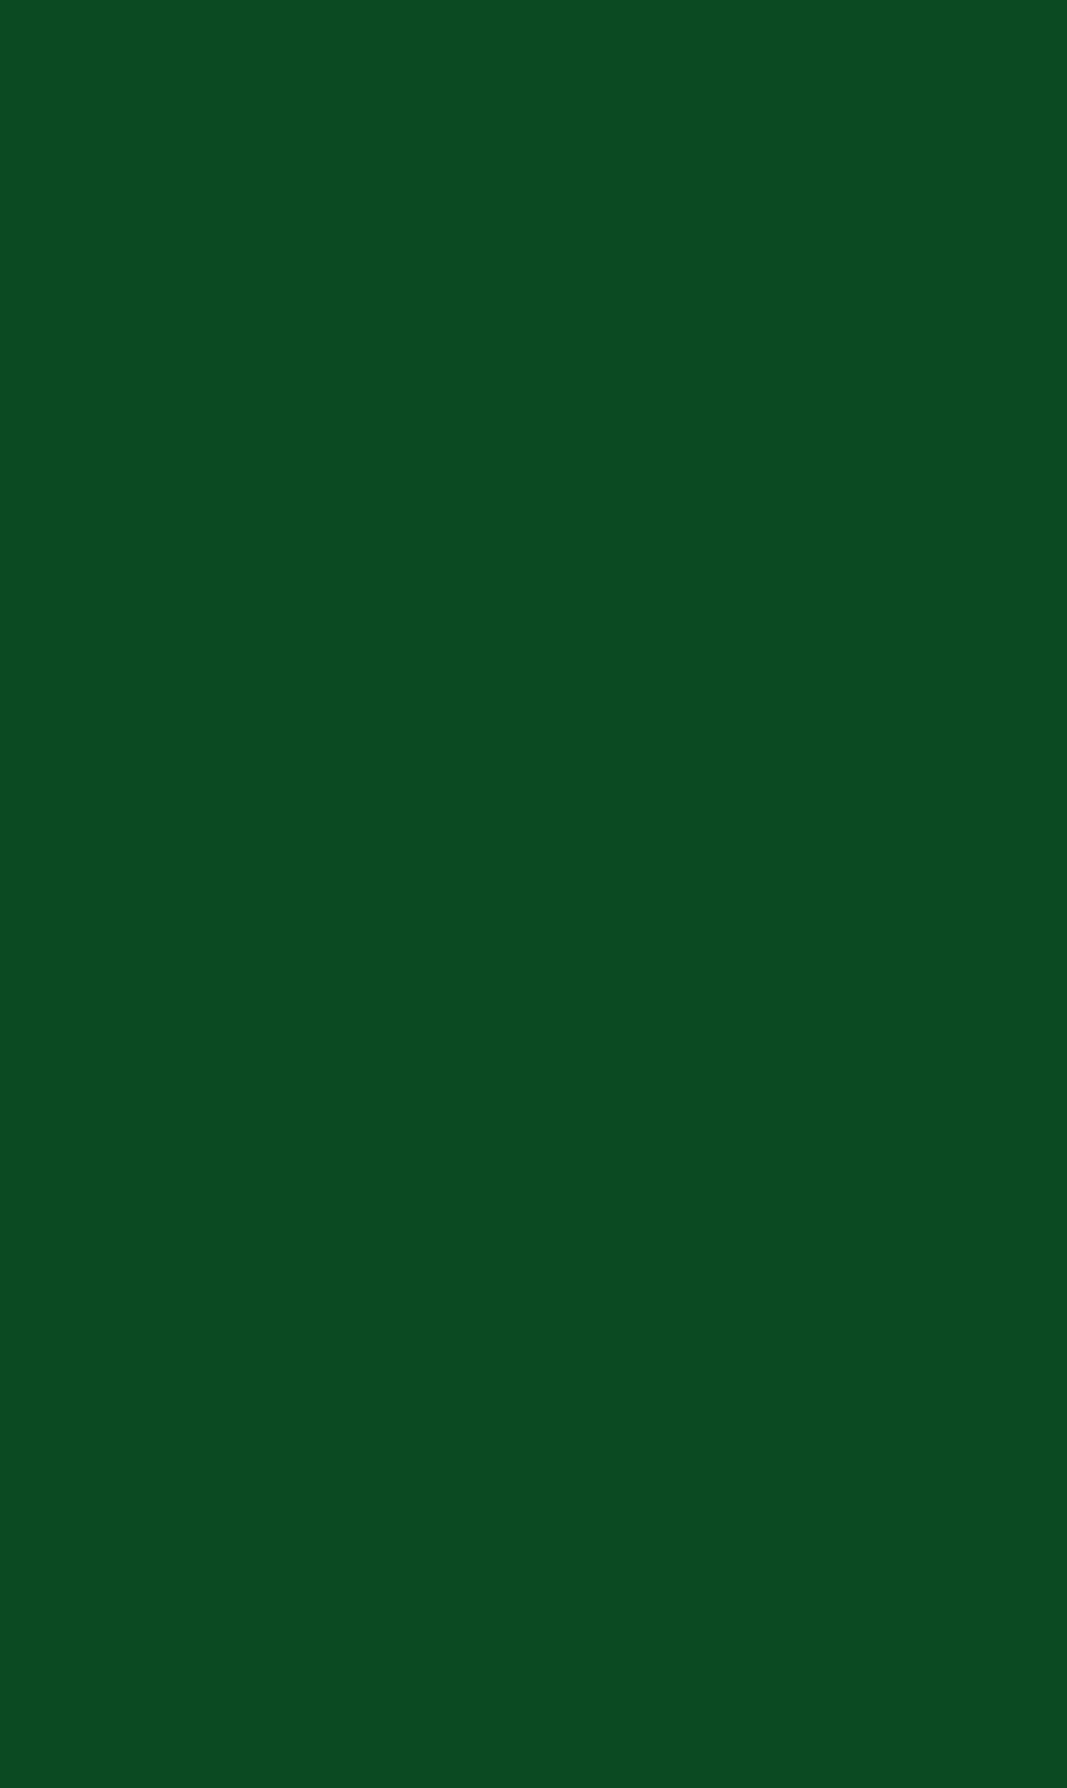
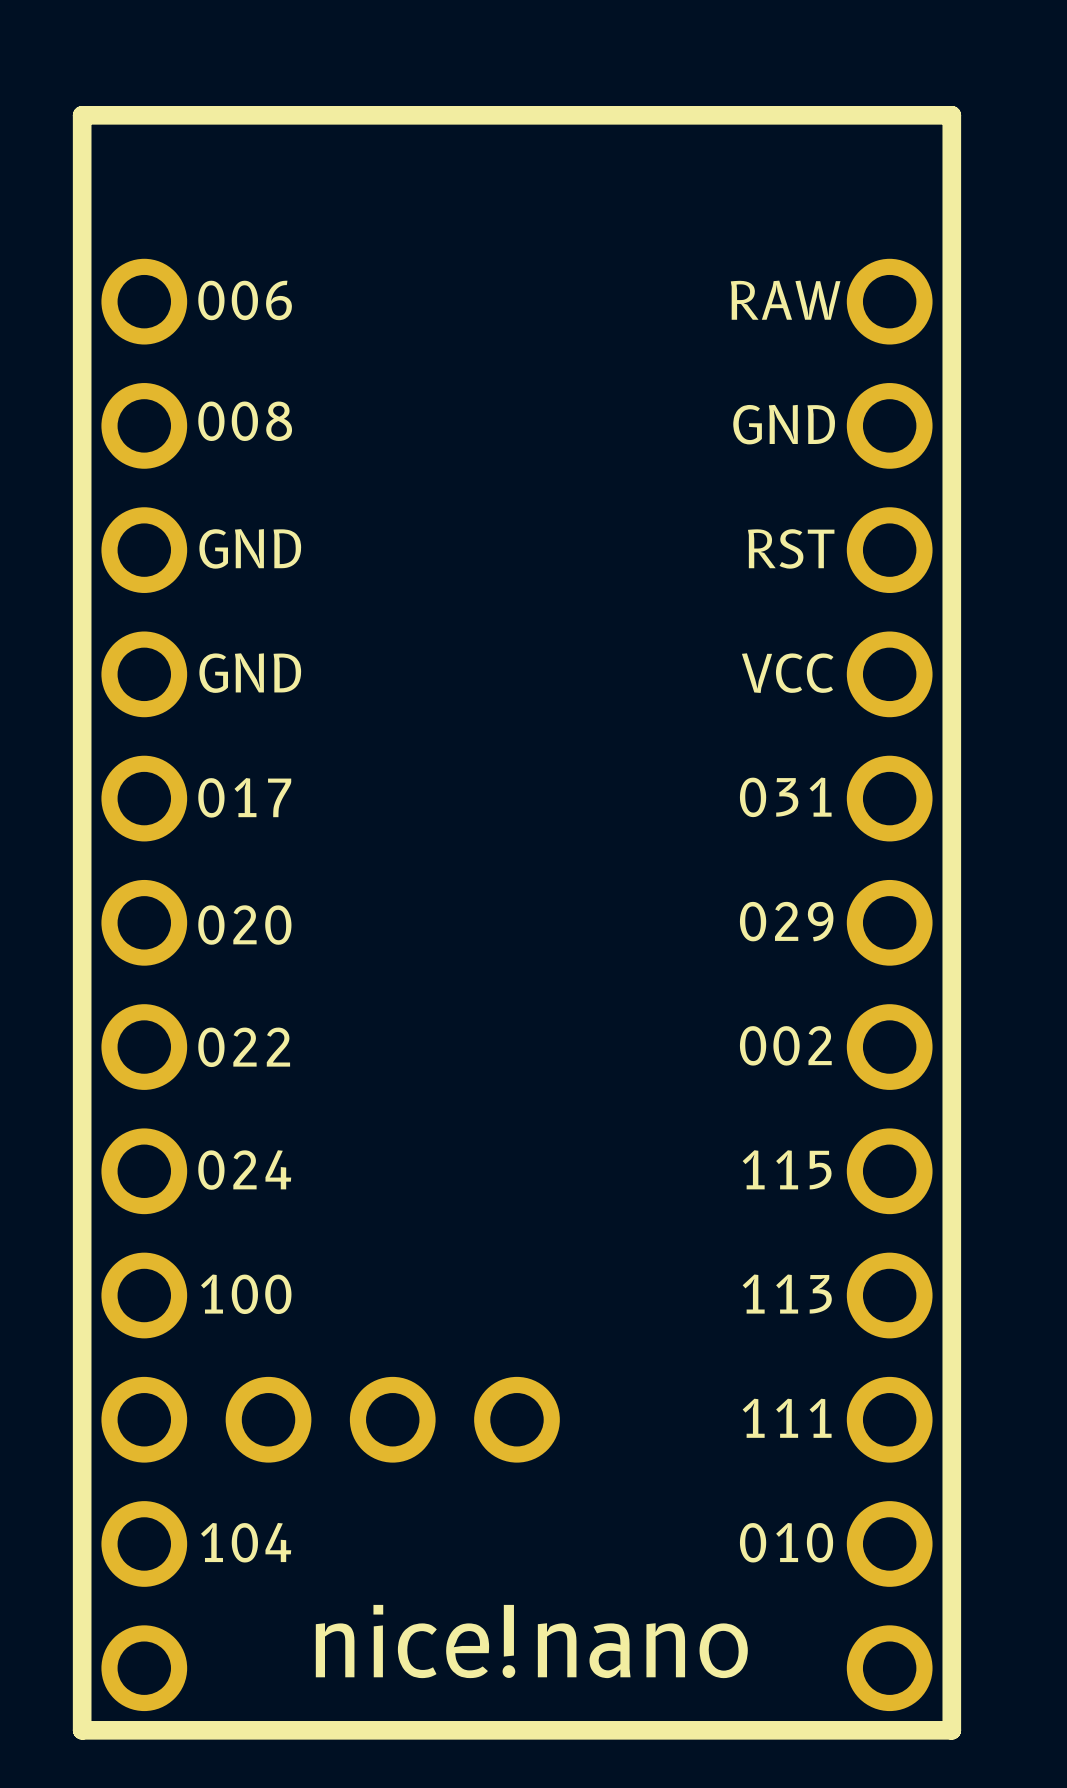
part: none -> (516, 922)

